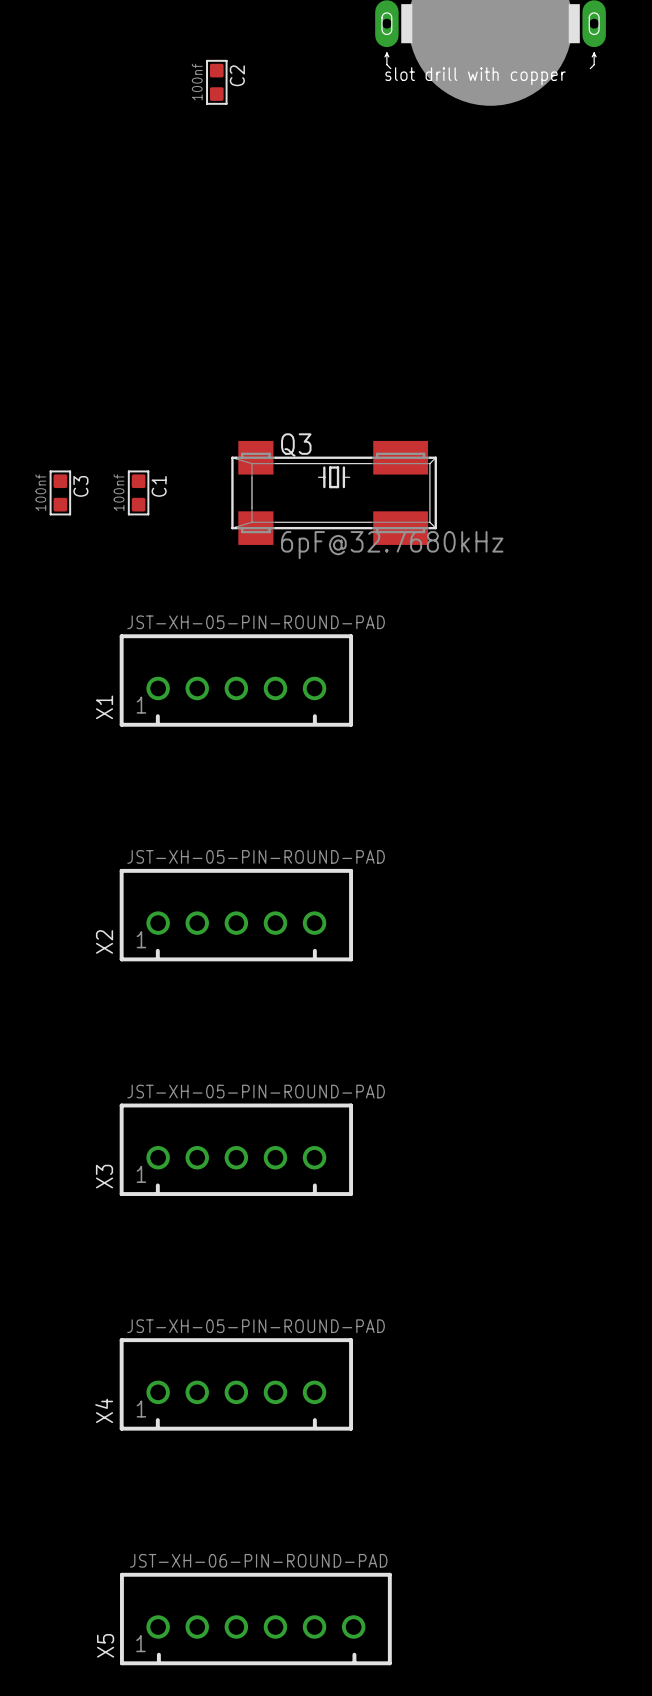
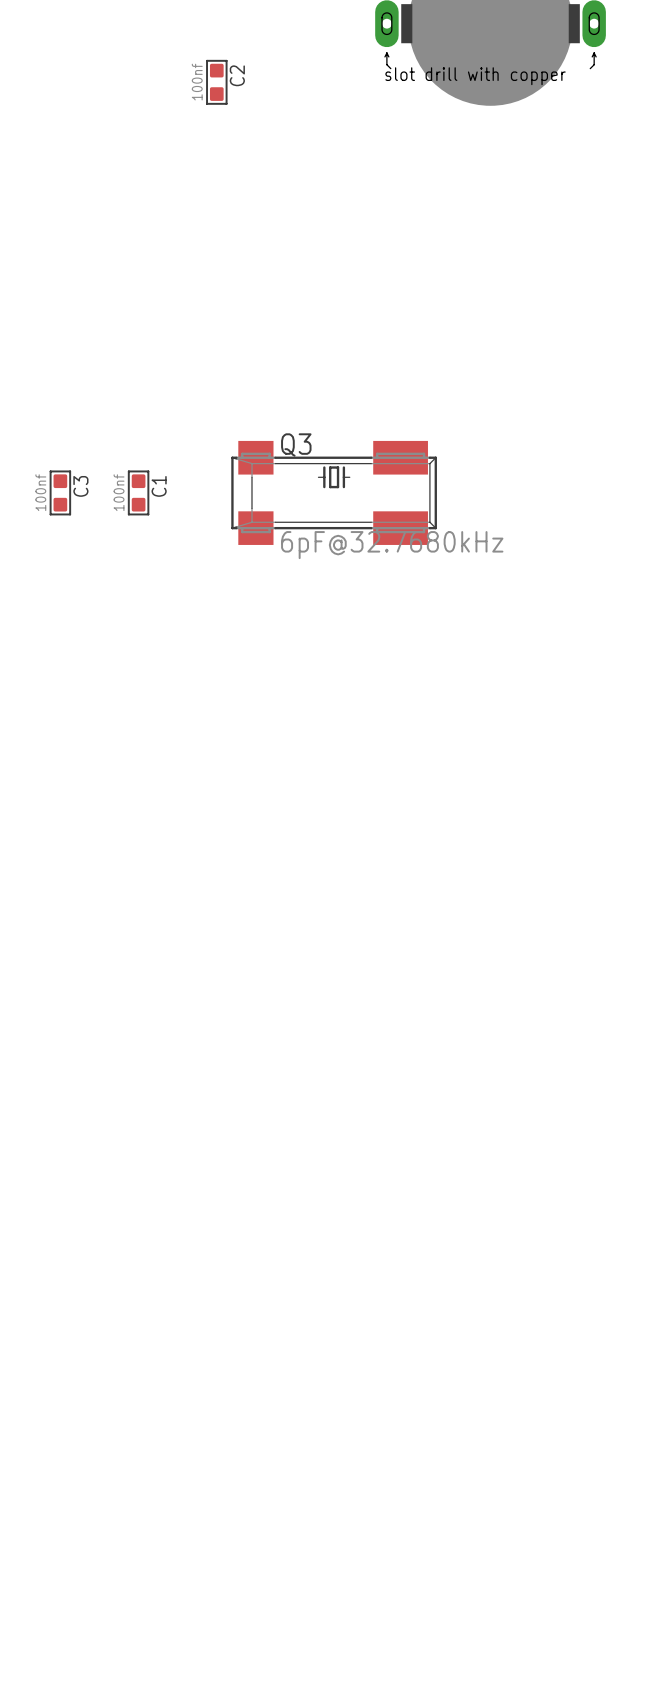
X1: JST-XH-05-PIN-ROUND-PAD (236, 680) -> none
X2: JST-XH-05-PIN-ROUND-PAD (236, 915) -> none
X3: JST-XH-05-PIN-ROUND-PAD (236, 1149) -> none
X4: JST-XH-05-PIN-ROUND-PAD (236, 1384) -> none
X5: JST-XH-06-PIN-ROUND-PAD (255, 1619) -> none

